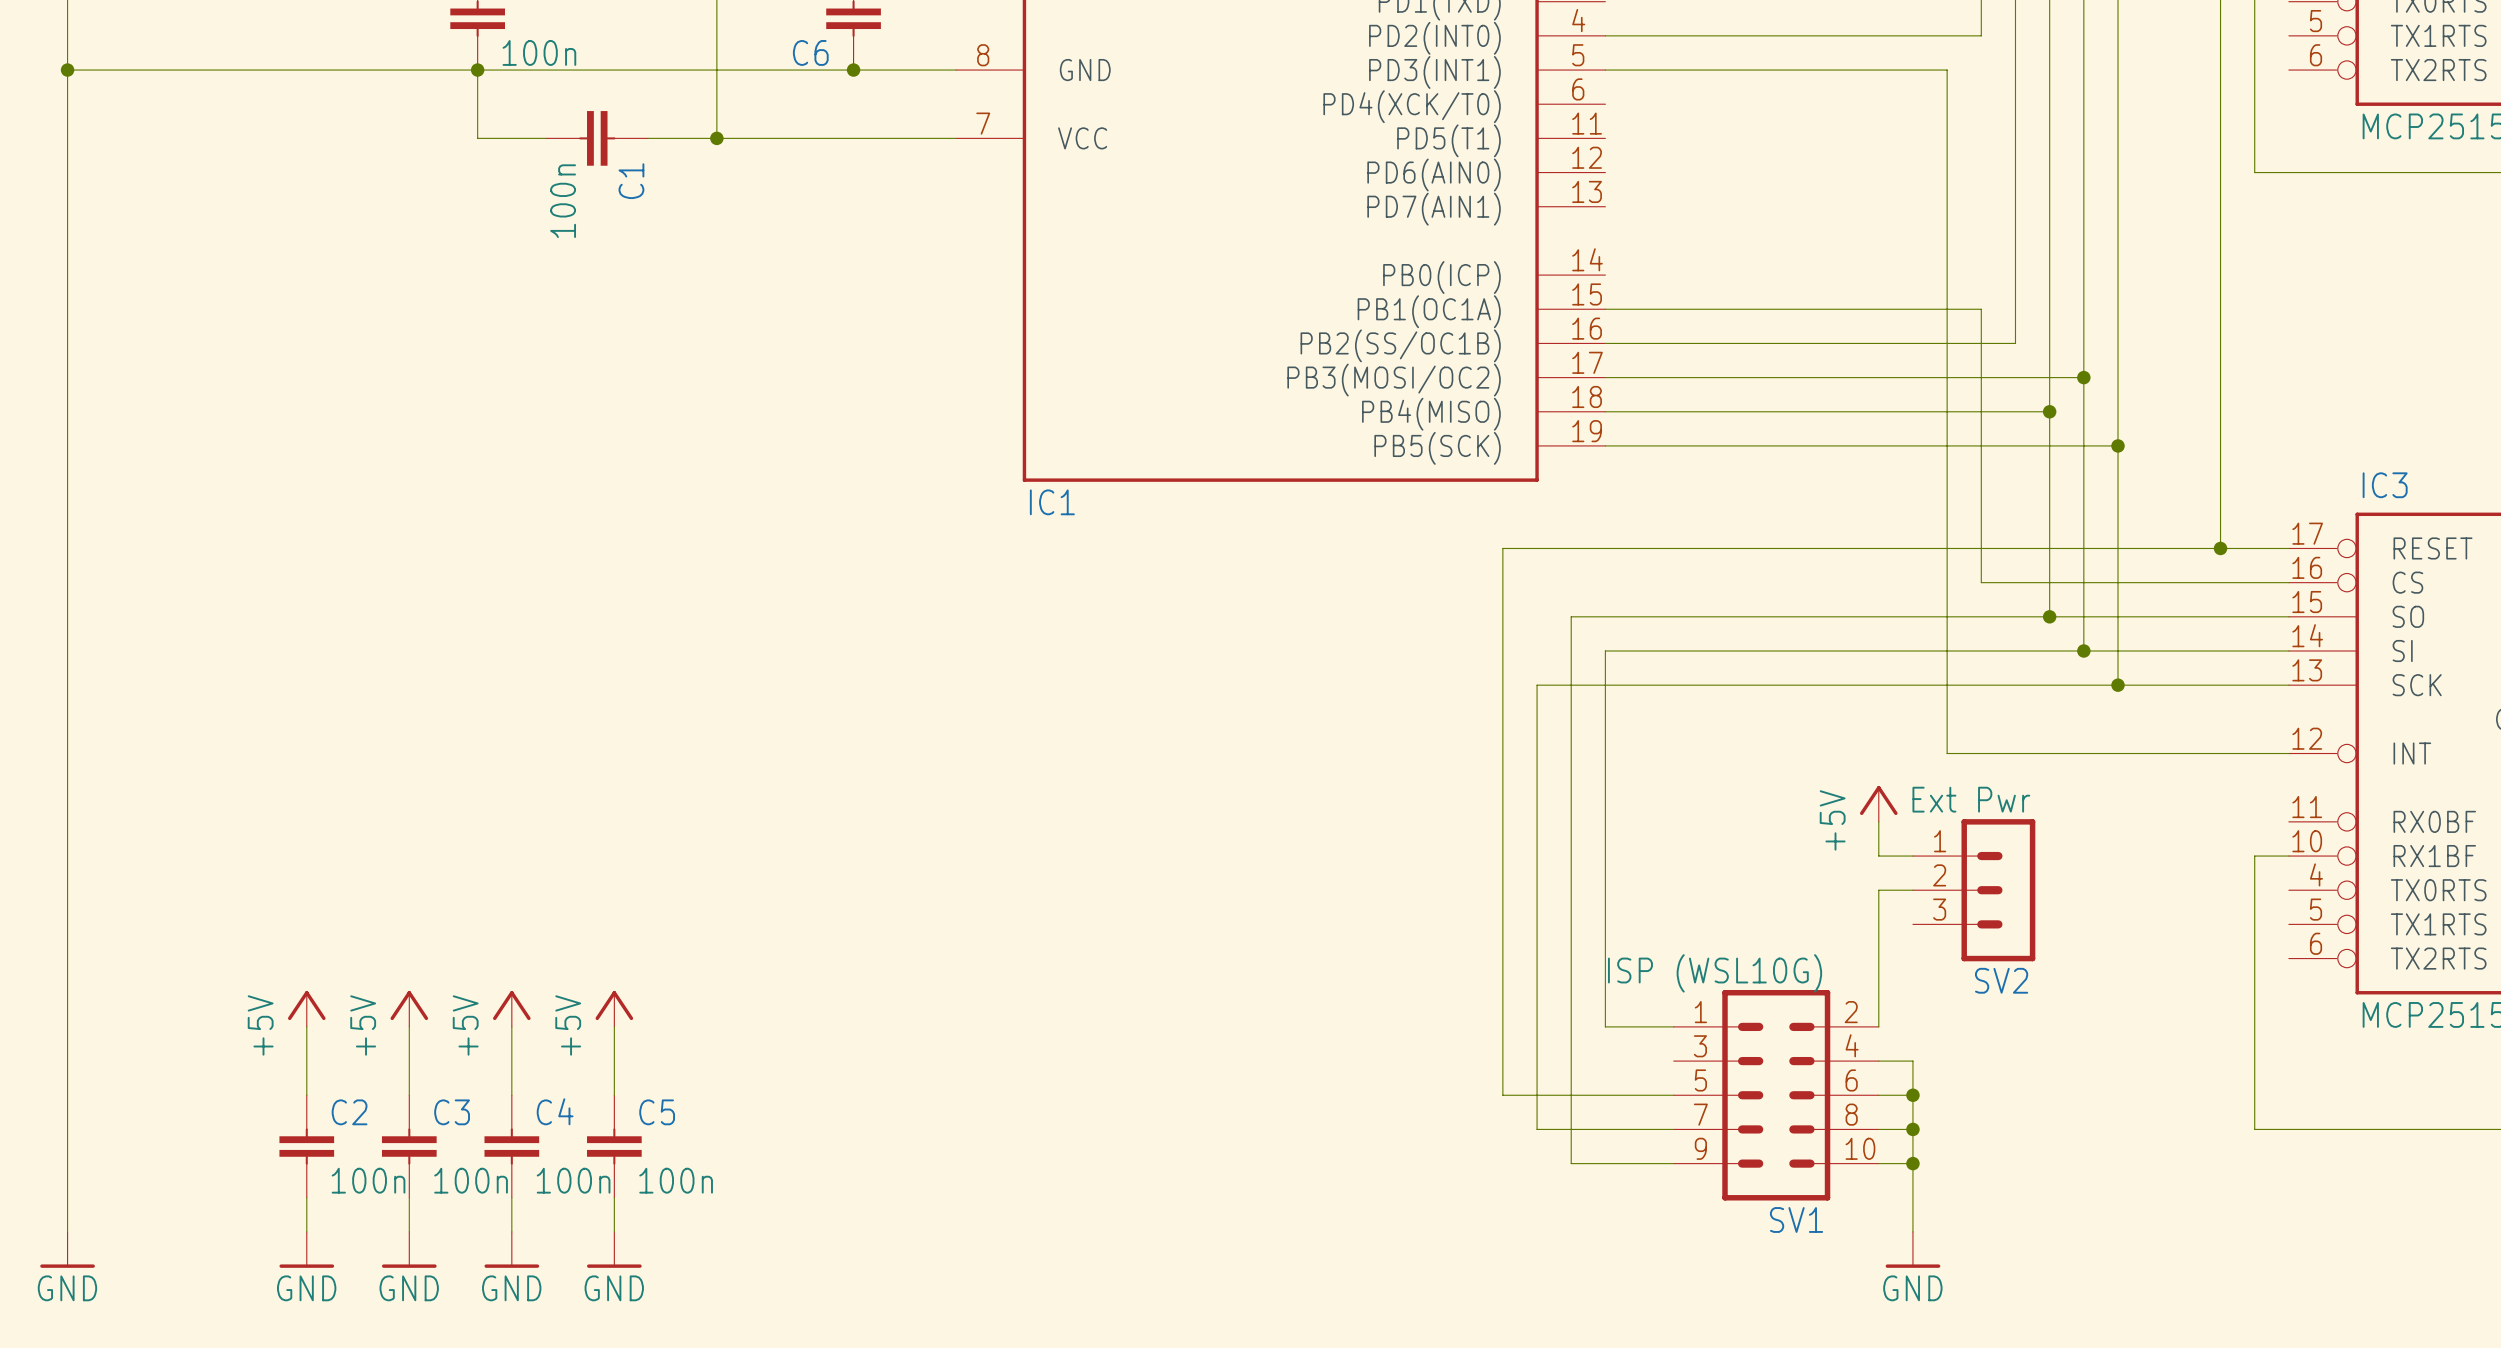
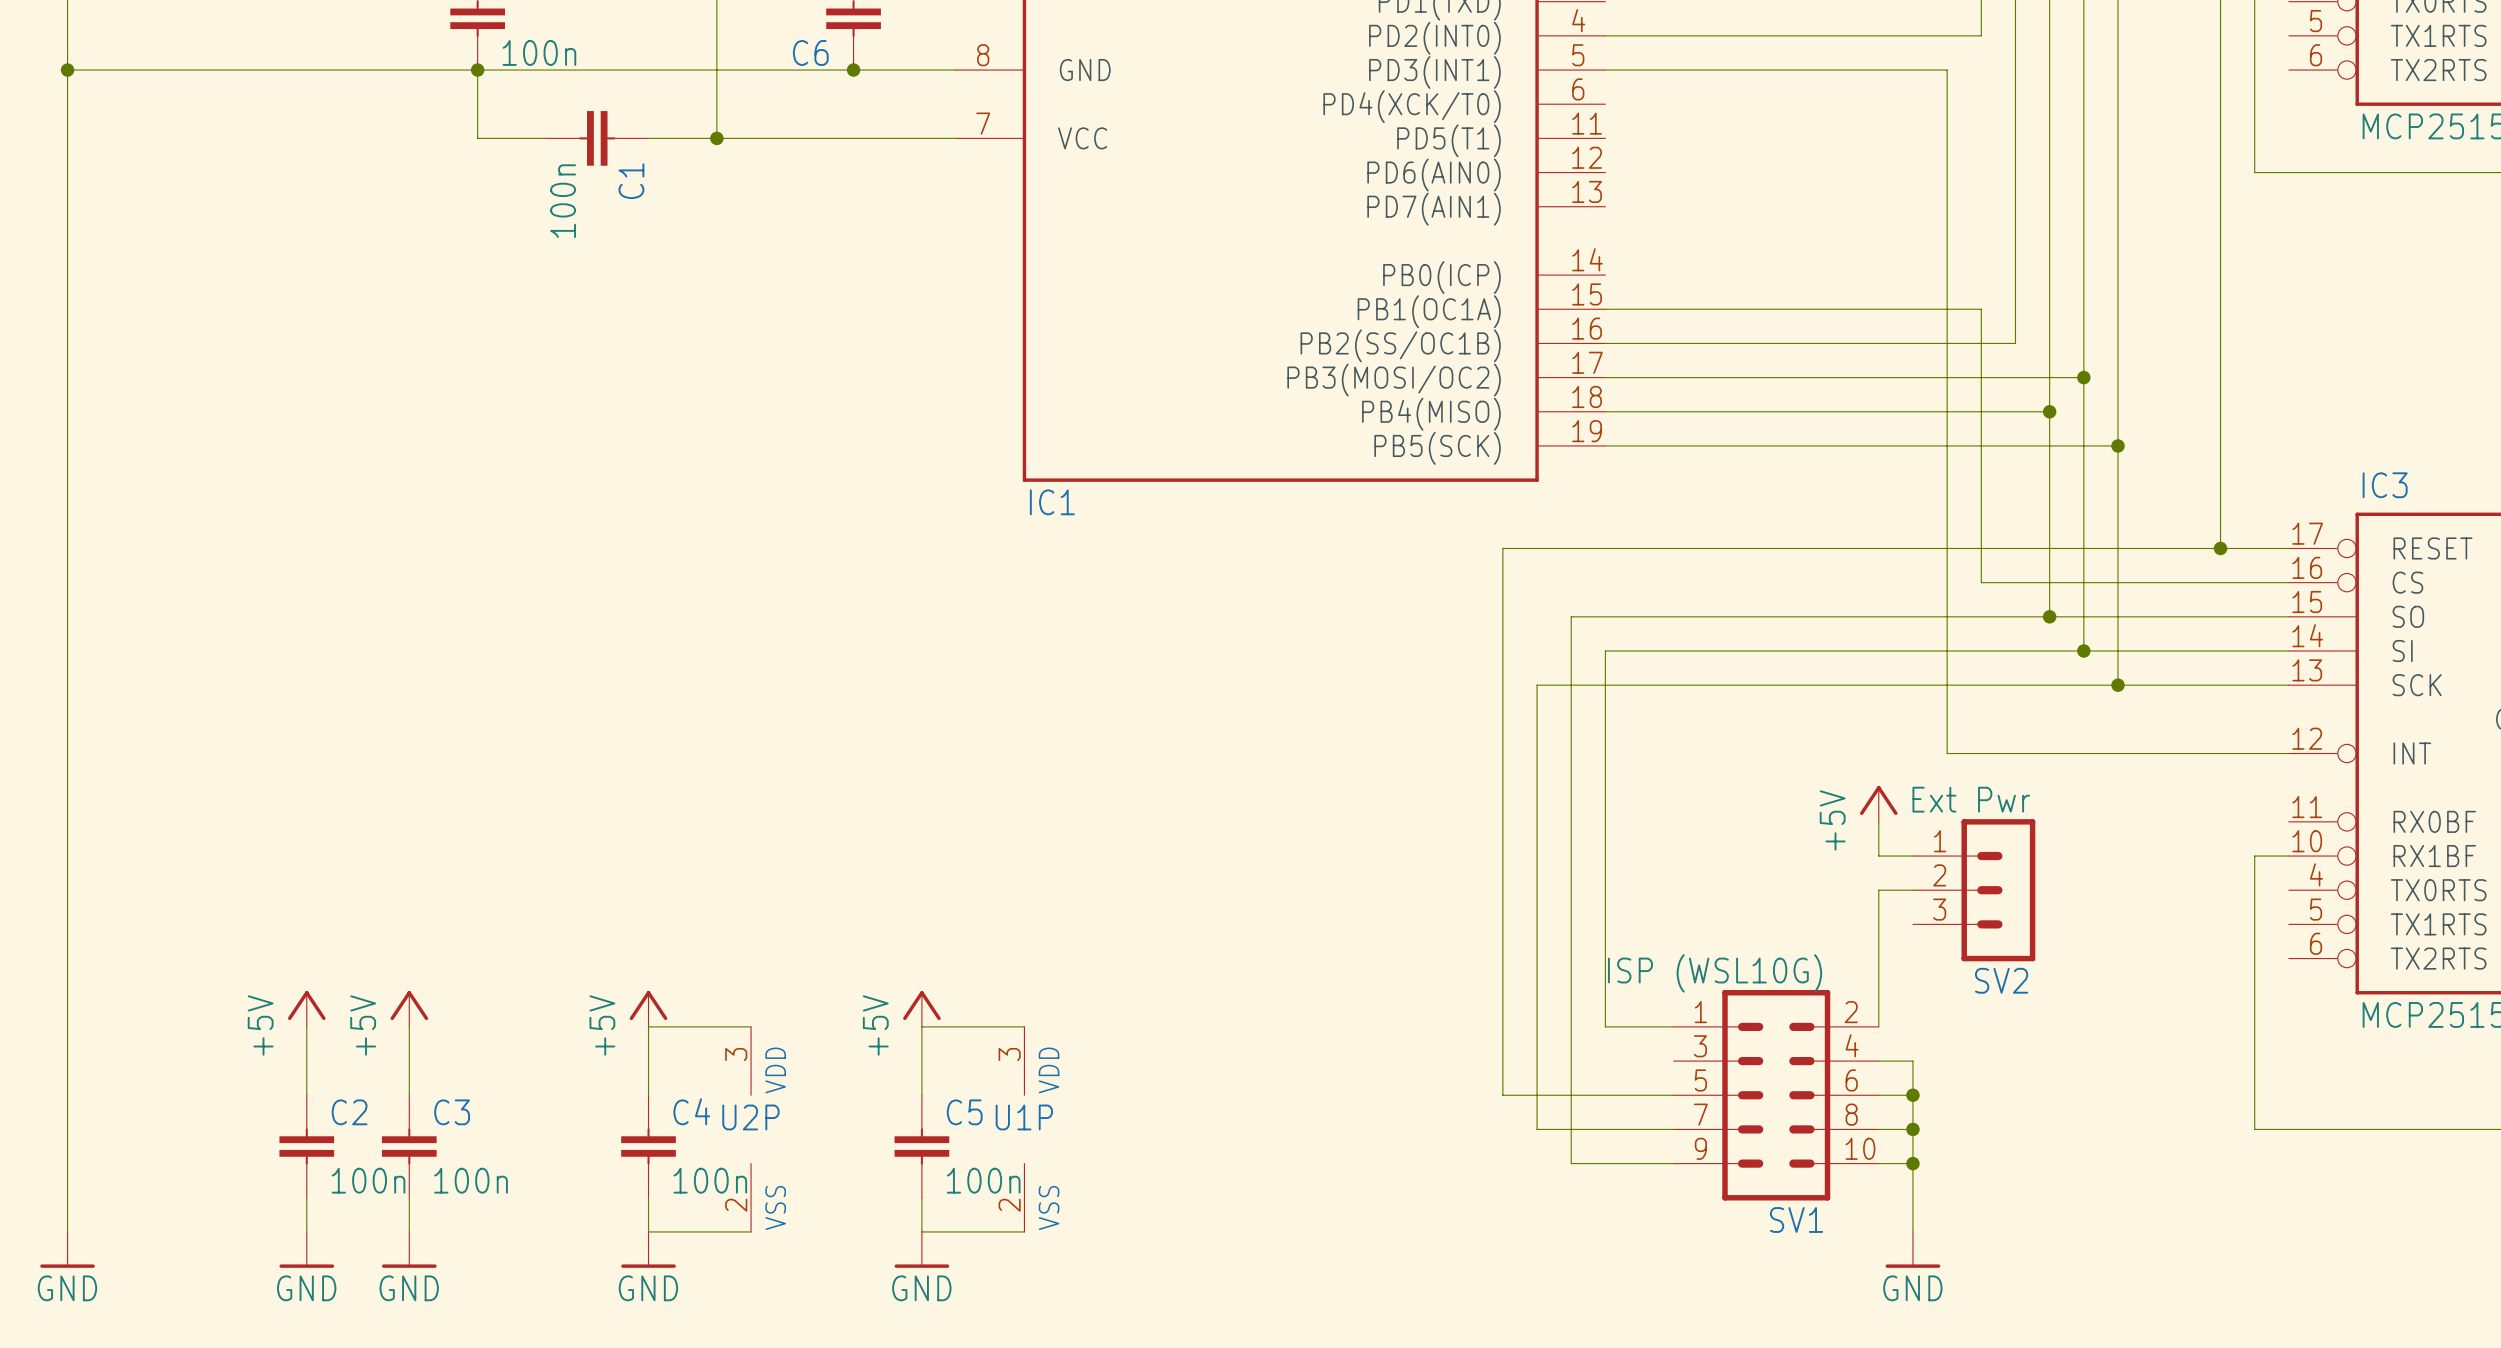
power symbol: +5V (511, 1008) -> none
power symbol position: +5V (614, 1008) -> +5V (648, 1008)
power symbol: none -> +5V (921, 1008)
wire: (511, 1026) (511, 1095) -> none
wire: (614, 1026) (614, 1095) -> none
wire: none -> (751, 1026) (648, 1026) (648, 1095)
wire: none -> (1024, 1026) (921, 1026) (921, 1095)
U2P: none -> (751, 1129)
U1P: none -> (1024, 1129)
C4 position: (511, 1146) -> (648, 1146)
C5 position: (614, 1146) -> (921, 1146)
wire: (511, 1197) (511, 1231) -> none
wire: (614, 1197) (614, 1231) -> none
wire: none -> (648, 1197) (648, 1231) (751, 1231)
wire: none -> (921, 1197) (921, 1231) (1024, 1231)
power symbol: GND (511, 1249) -> none
power symbol position: GND (614, 1249) -> GND (648, 1249)
power symbol: none -> GND (921, 1249)

